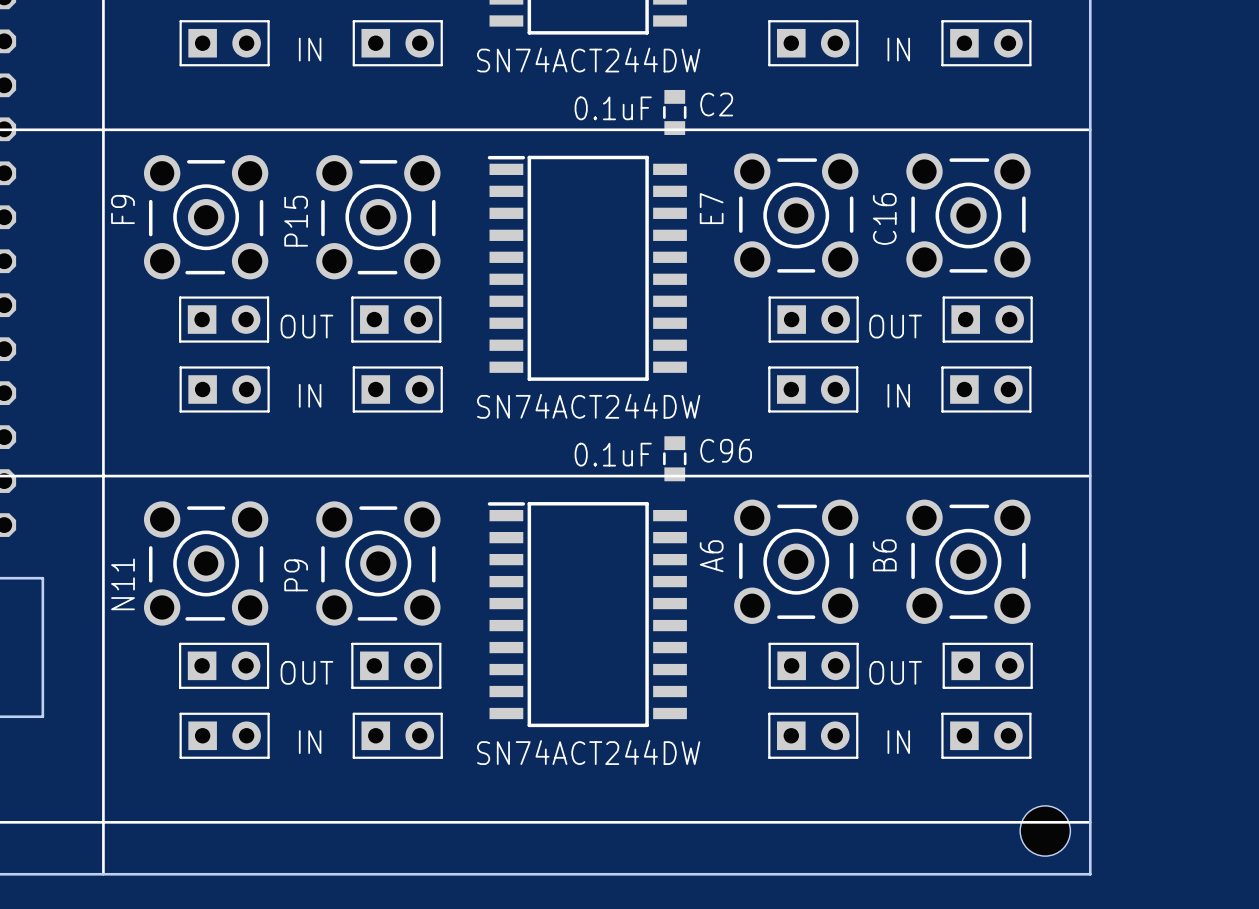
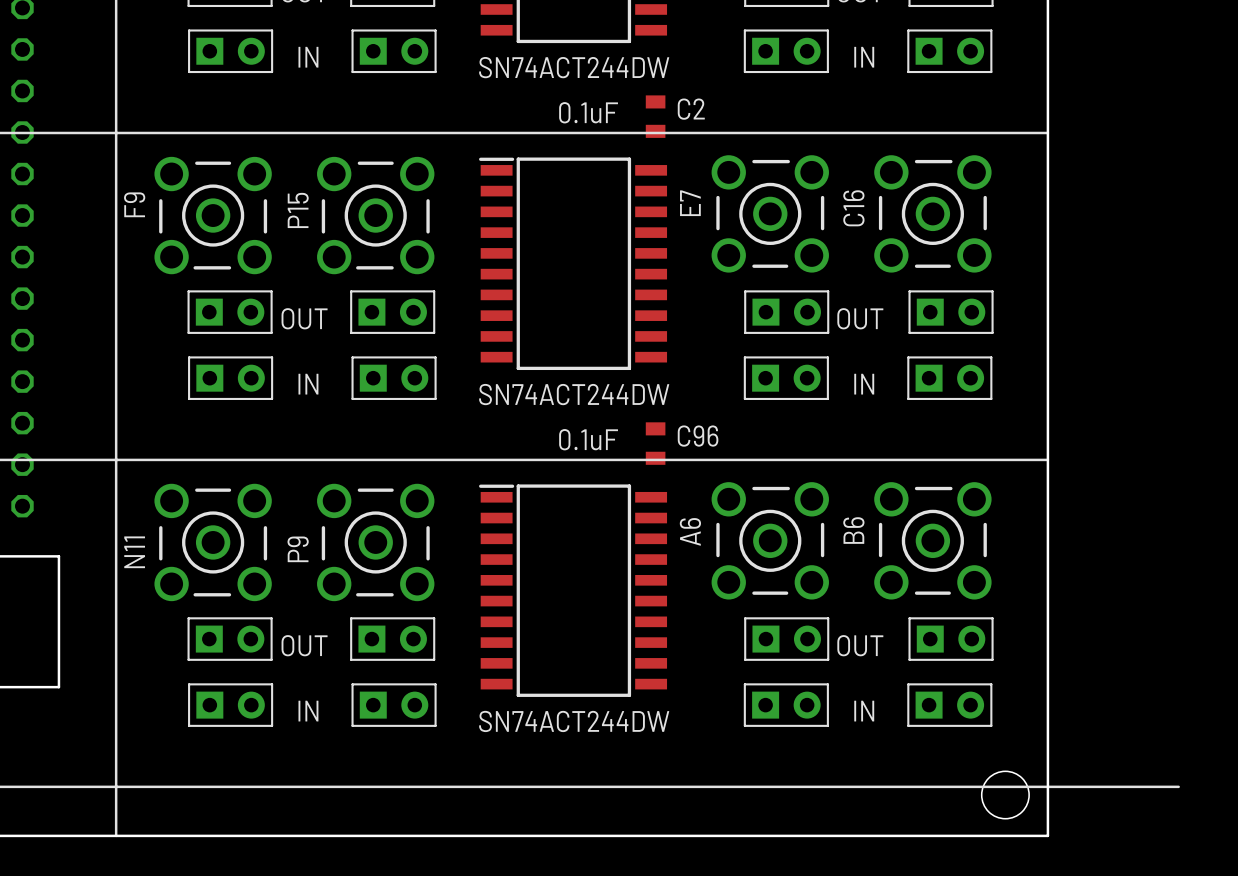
C2 footprint: [663, 89, 687, 135] -> [645, 95, 666, 138]
C96 footprint: [663, 436, 687, 482] -> [645, 422, 666, 465]
line: none -> (1047, 786) (1178, 786)

